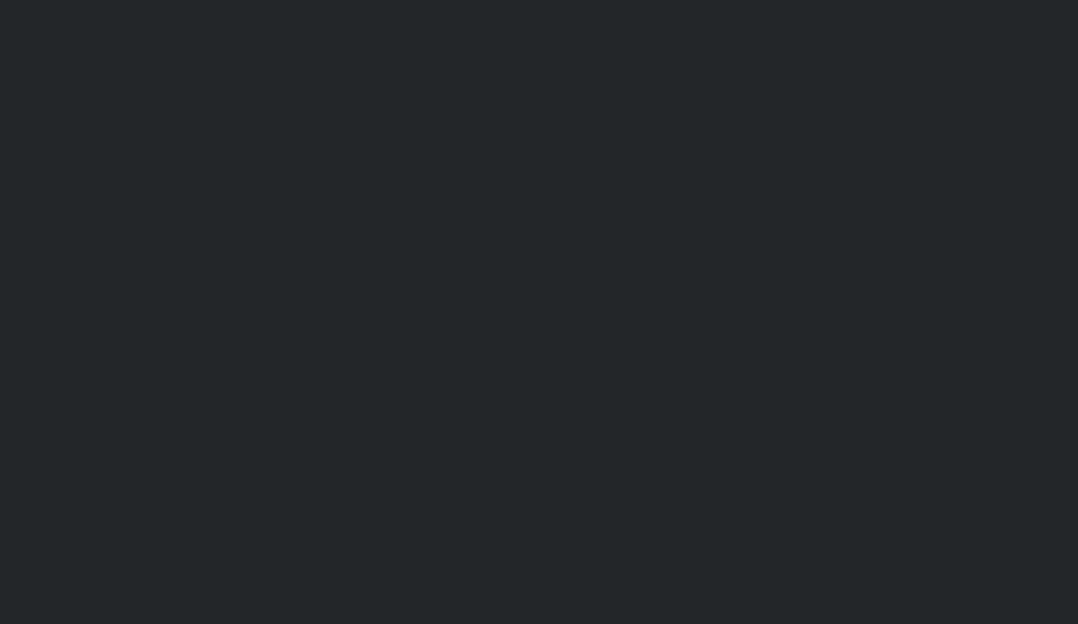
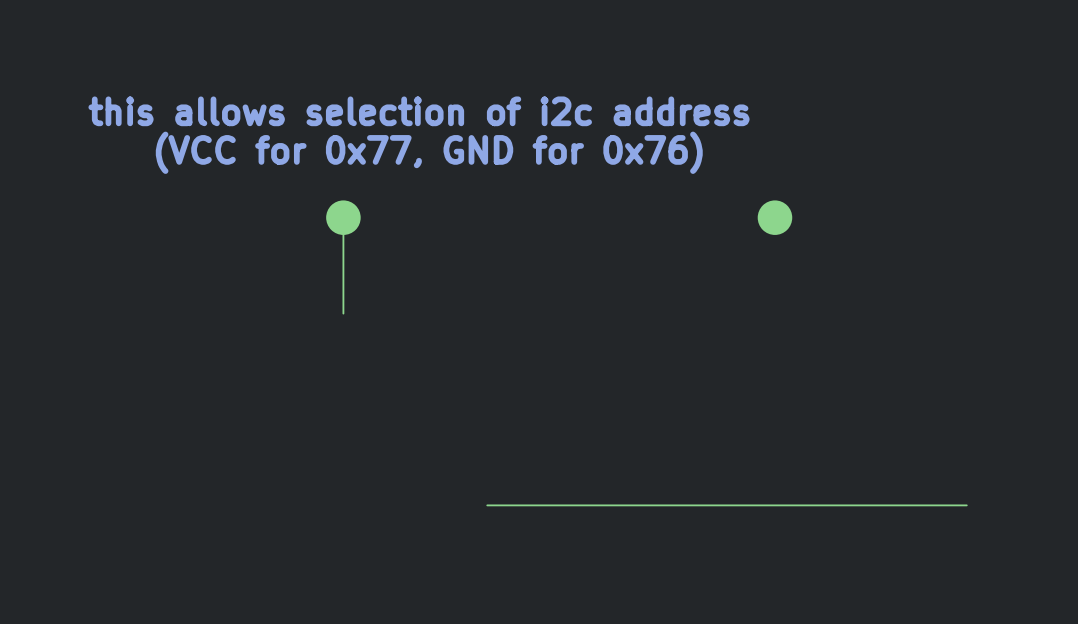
text: none -> this allows selection of i2c address (418, 111)
text: none -> (VCC for 0x77, GND for 0x76) (429, 152)
wire: none -> (343, 217) (343, 313)
junction: none -> (343, 217)
junction: none -> (774, 217)
wire: none -> (487, 505) (966, 505)

